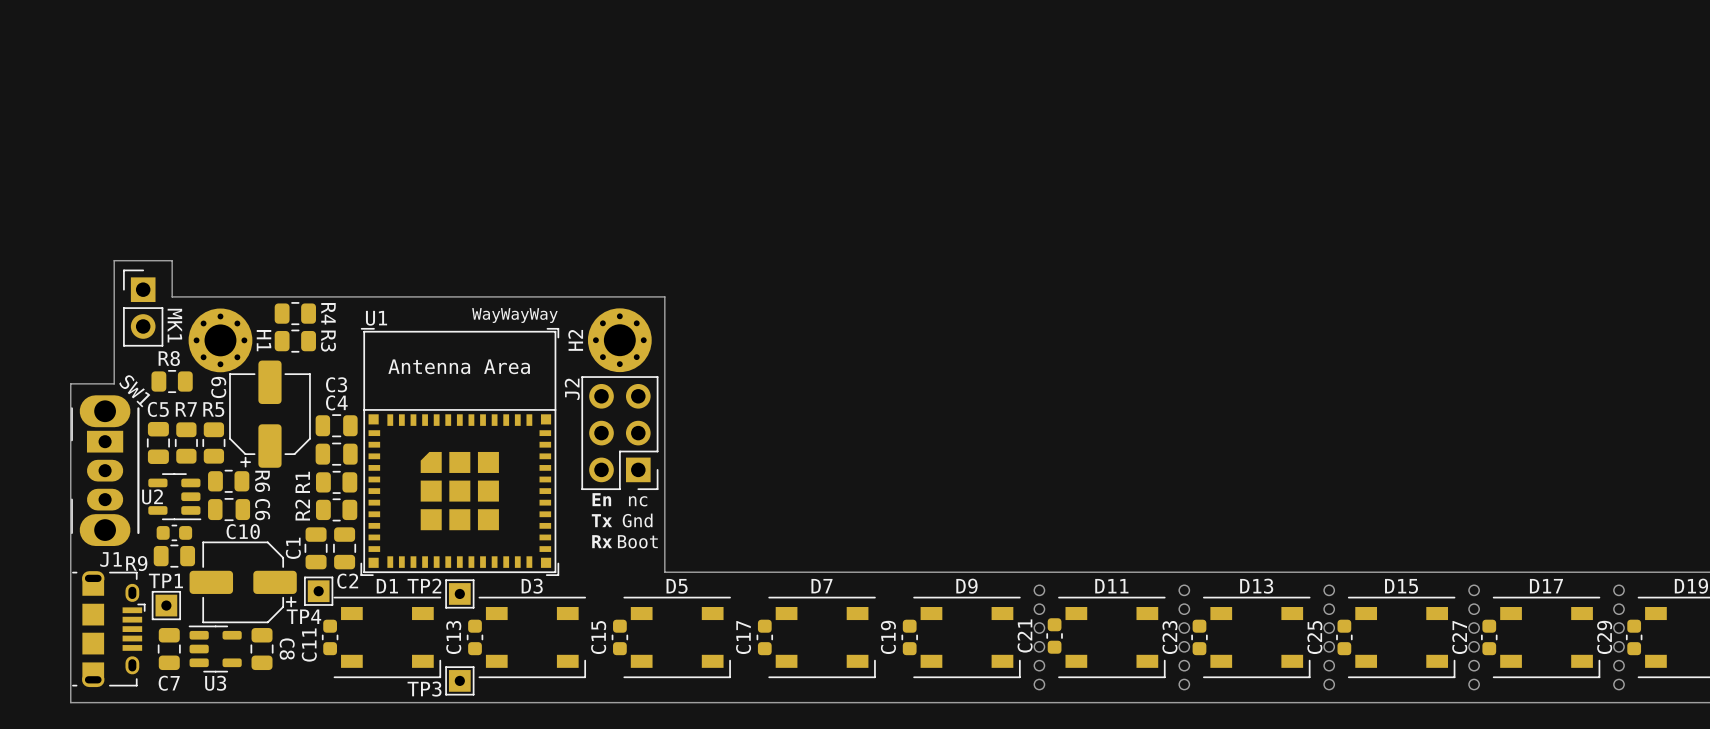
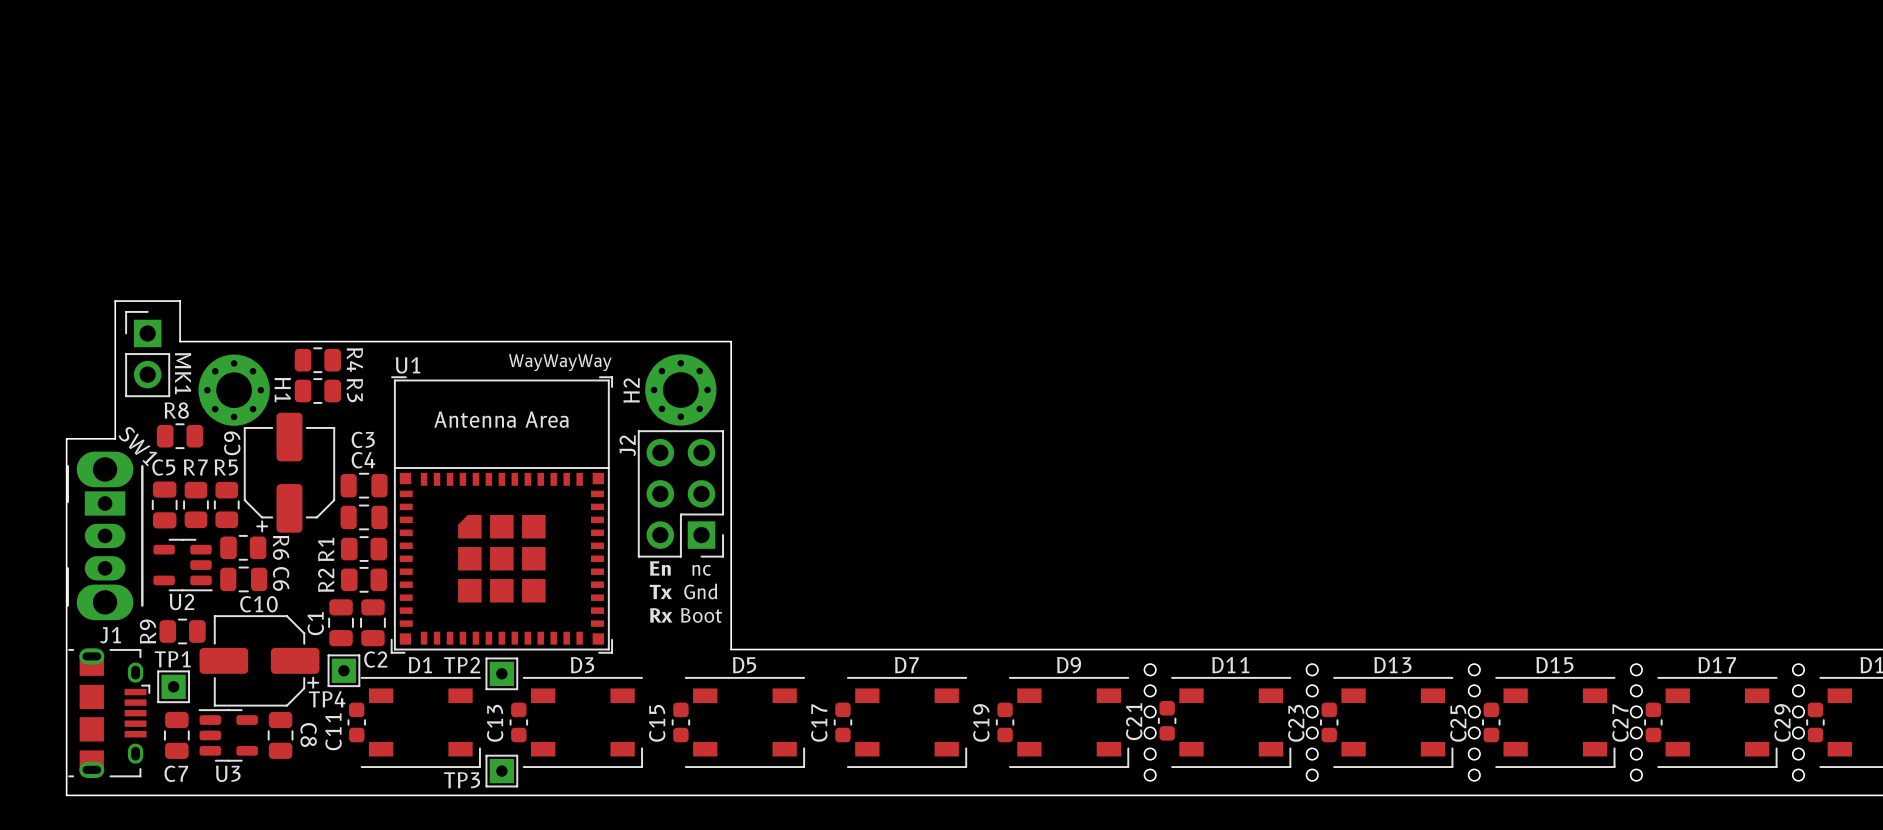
U2 name position: U2 (152, 496) -> U2 (182, 602)
part: (174, 532) -> none
R9 name rotation: 0° (136, 563) -> 90° counterclockwise (148, 631)

